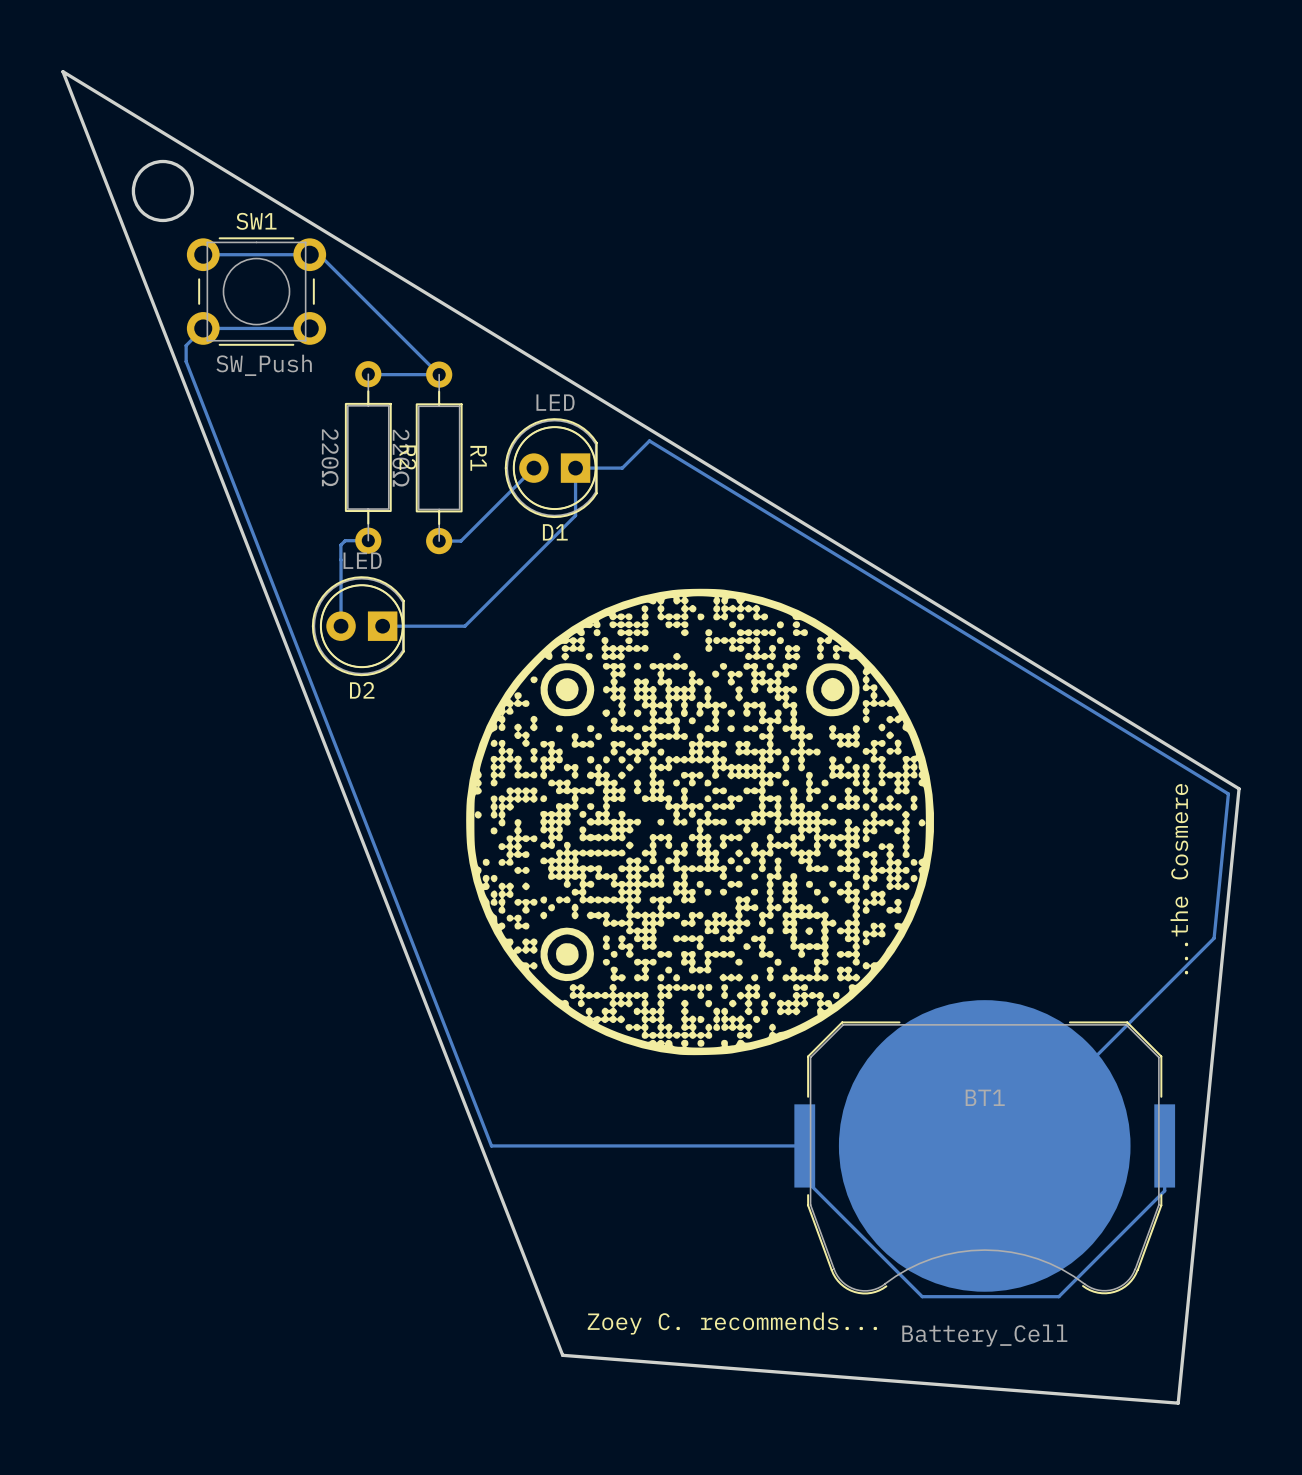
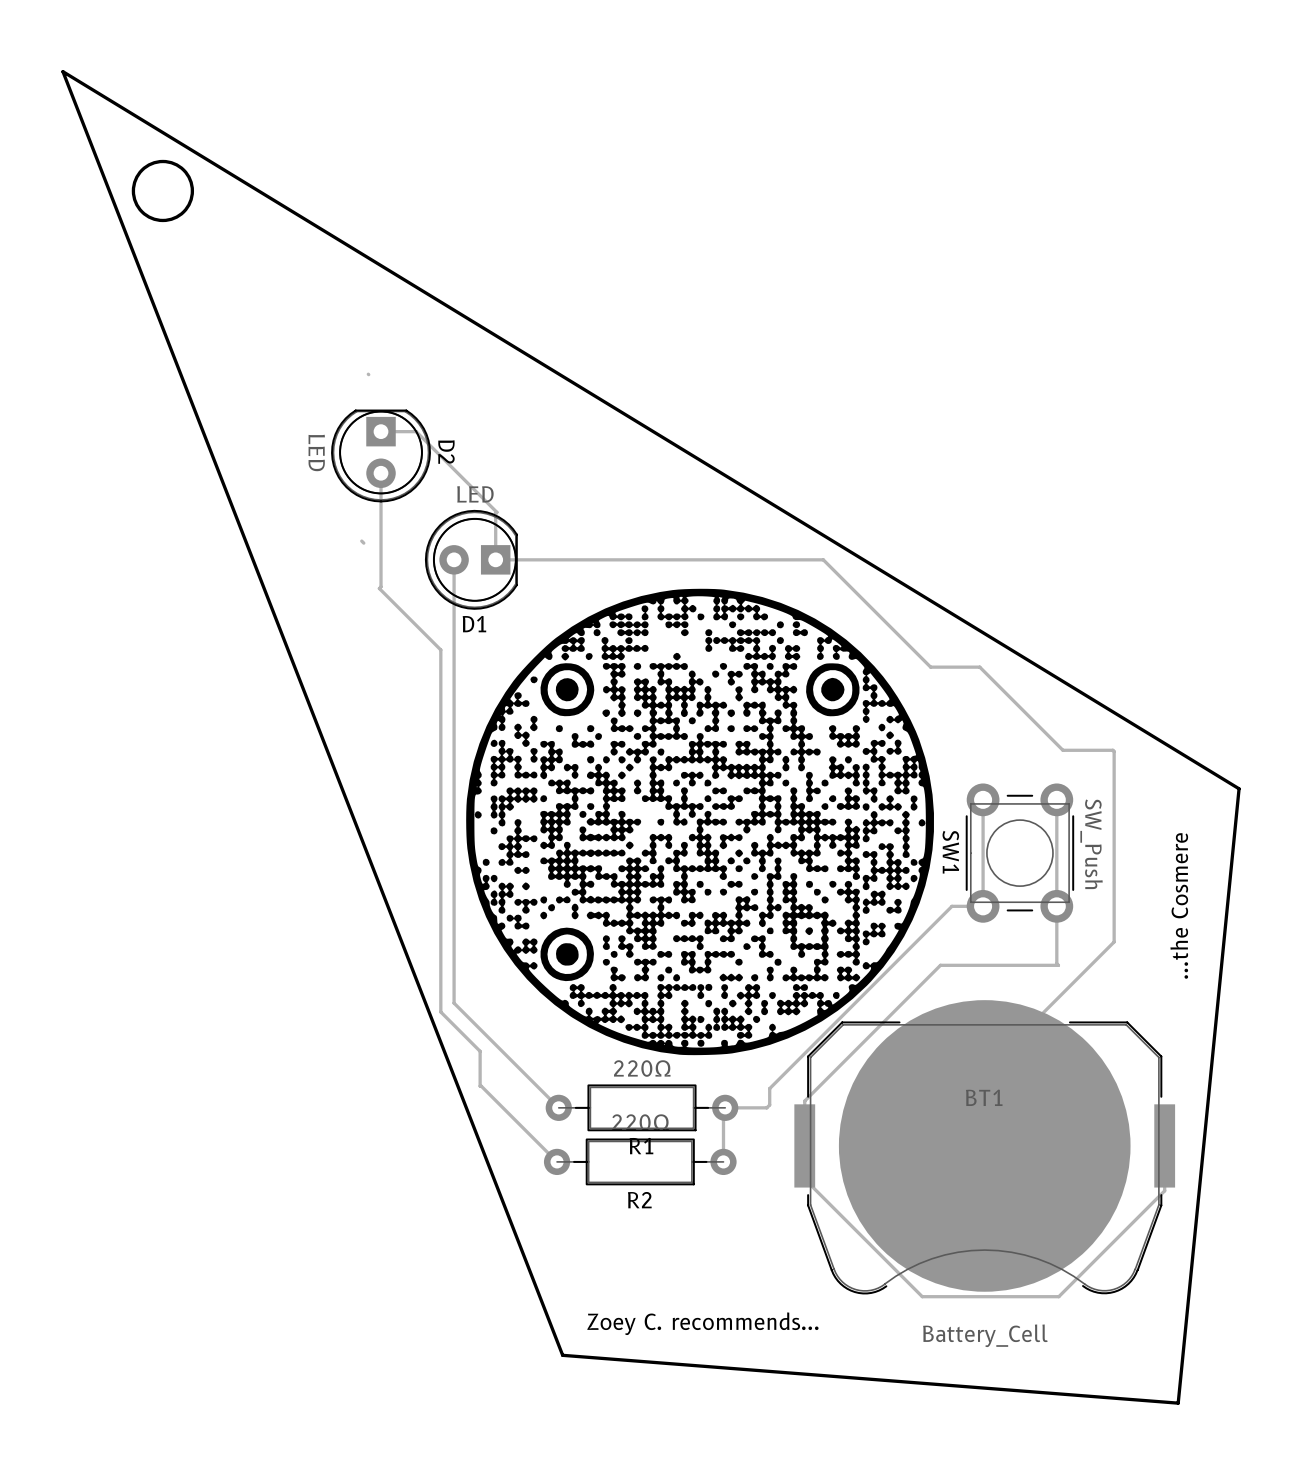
track: (203, 254) (319, 254) (439, 374) (368, 374) -> none
SW1 rotation: 0° (256, 291) -> 90° counterclockwise (1019, 853)
SW1 position: (256, 291) -> (1019, 853)
track: (309, 328) (203, 328) (186, 345) (186, 361) (491, 1145) (804, 1145) -> (1056, 799) (1056, 963) (1058, 965) (940, 965) (804, 1101) (804, 1145)
track: none -> (381, 431) (416, 431) (496, 512) (495, 559) (823, 559) (930, 667) (979, 667) (1062, 750) (1114, 751) (1114, 941) (984, 1071) (984, 1145)
R2 rotation: 0° (368, 457) -> 90° clockwise (640, 1161)
R2 position: (368, 457) -> (640, 1161)
R1 rotation: 0° (439, 457) -> 90° clockwise (641, 1107)
R1 position: (439, 457) -> (641, 1107)
track: (533, 468) (460, 541) (439, 541) -> none
D1 position: (551, 468) -> (471, 559)
track: none -> (381, 473) (381, 586) (379, 588) (440, 649) (440, 1012) (480, 1051) (480, 1086) (557, 1161)
track: (368, 540) (345, 540) (340, 545) (340, 559) -> none
track: none -> (454, 559) (454, 1003) (558, 1107)
track: (341, 560) (341, 626) -> none
D2 rotation: 0° (358, 626) -> 90° counterclockwise (381, 455)
D2 position: (358, 626) -> (381, 455)
track: (382, 626) (464, 626) (575, 515) (575, 468) (622, 468) (649, 440) (1228, 793) (1214, 938) (1006, 1145) -> none
track: none -> (983, 799) (983, 906) (951, 906) (769, 1088) (769, 1104) (766, 1107) (725, 1107) (723, 1109) (723, 1161)

